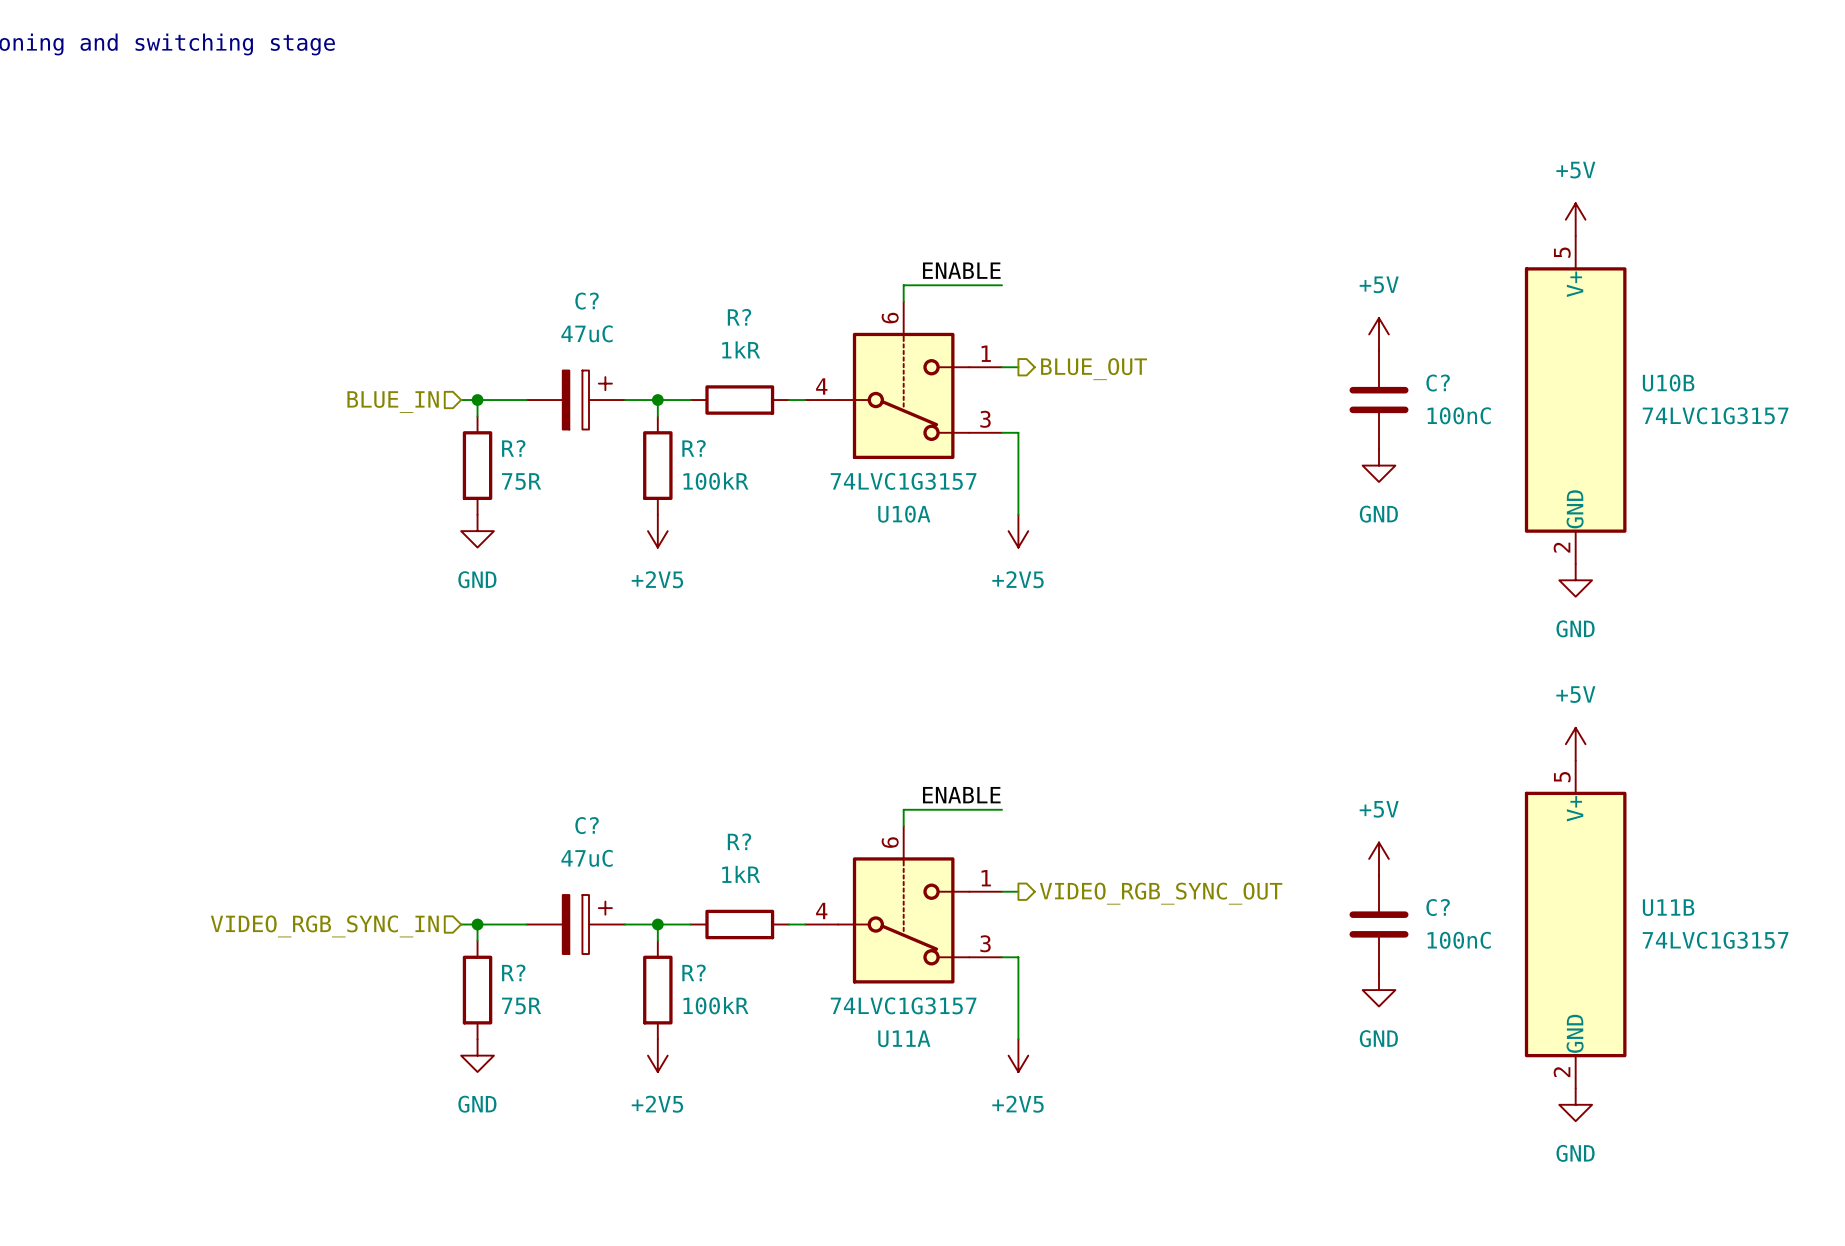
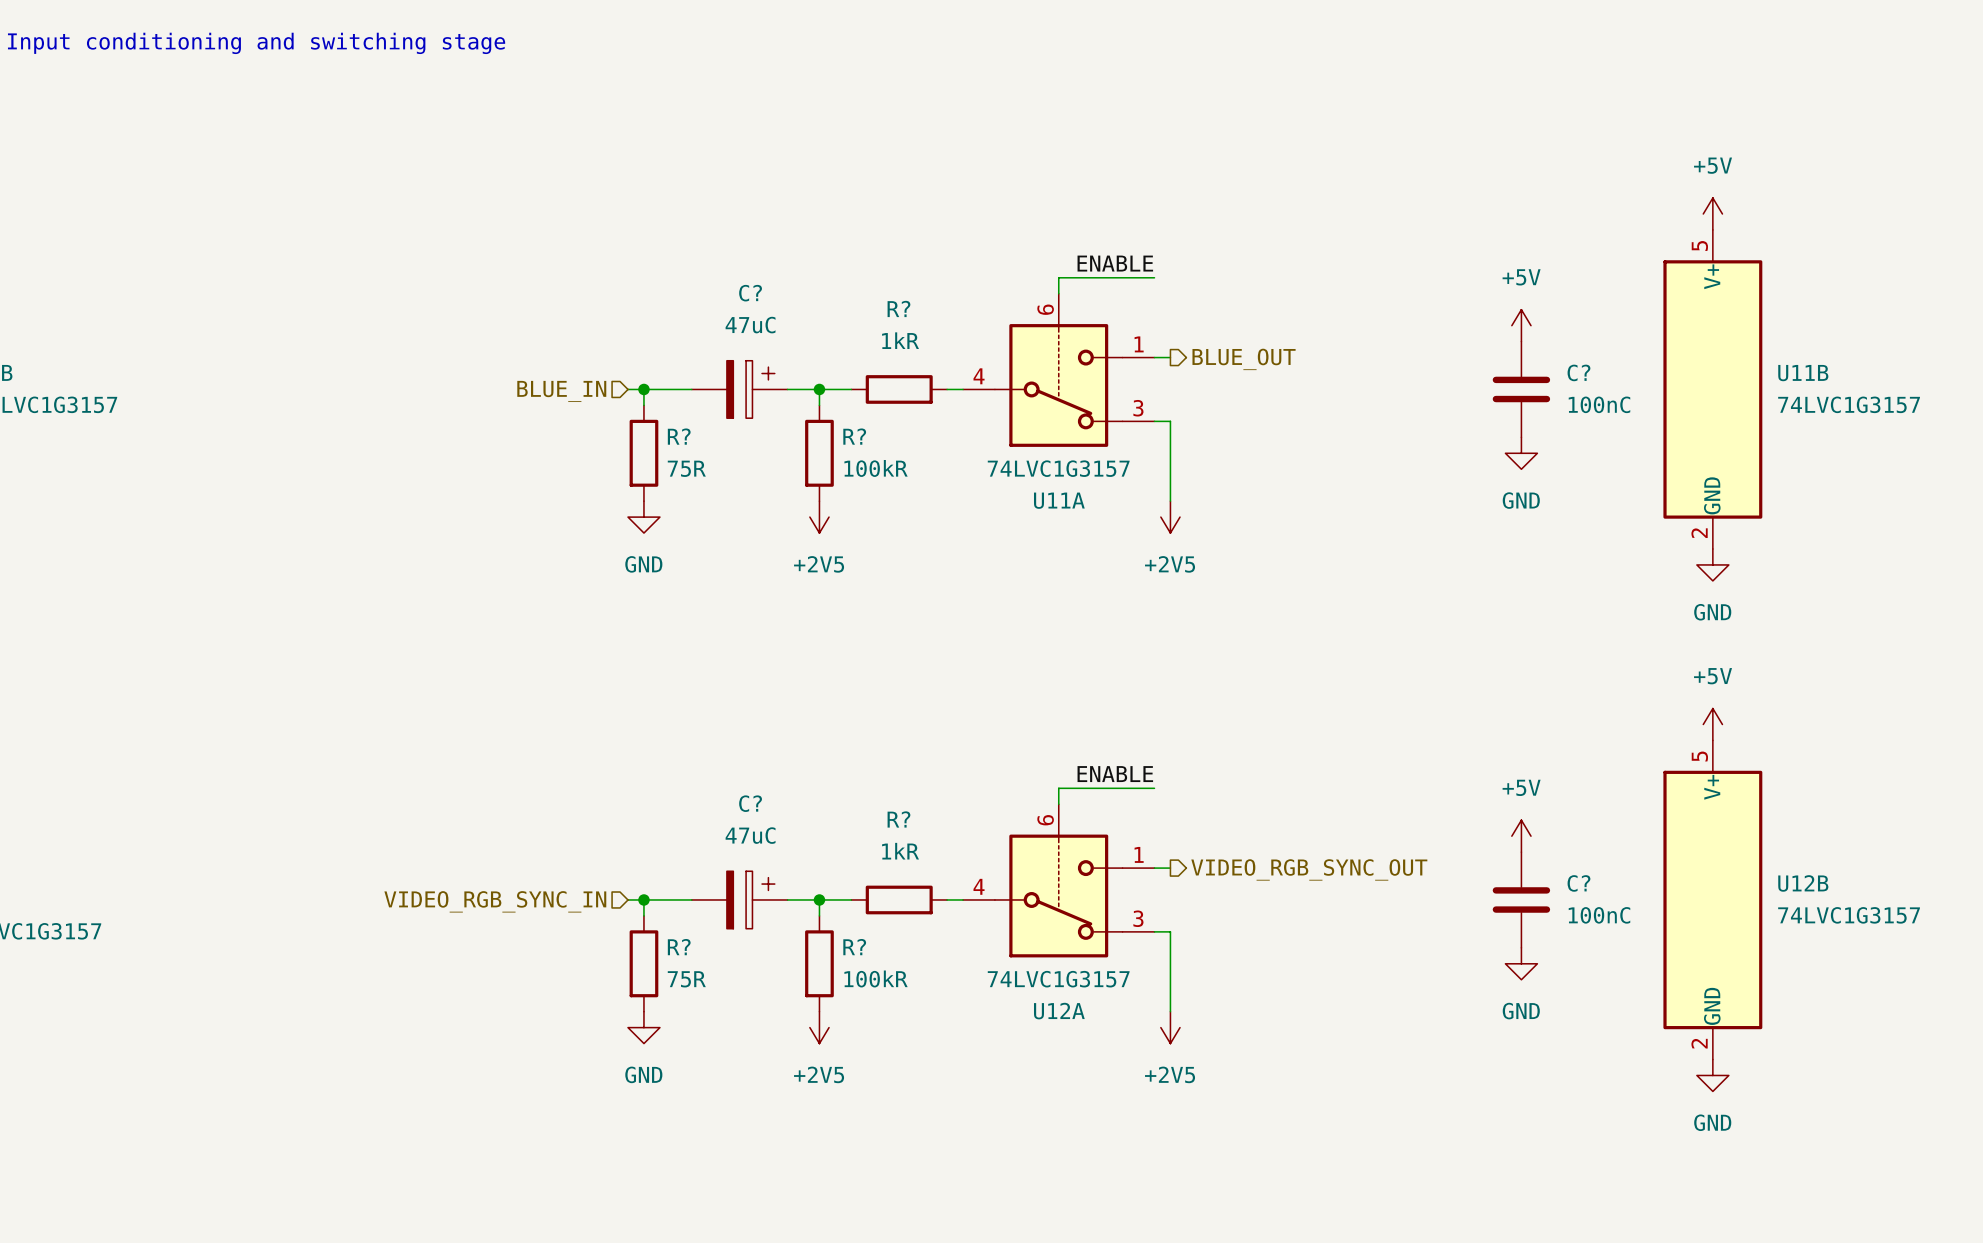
U10B name: U10B (1668, 383) -> U11B (1803, 373)
U10A name: U10A (904, 514) -> U11A (1059, 500)
U11B name: U11B (1668, 907) -> U12B (1803, 883)
U11A name: U11A (904, 1038) -> U12A (1059, 1011)

